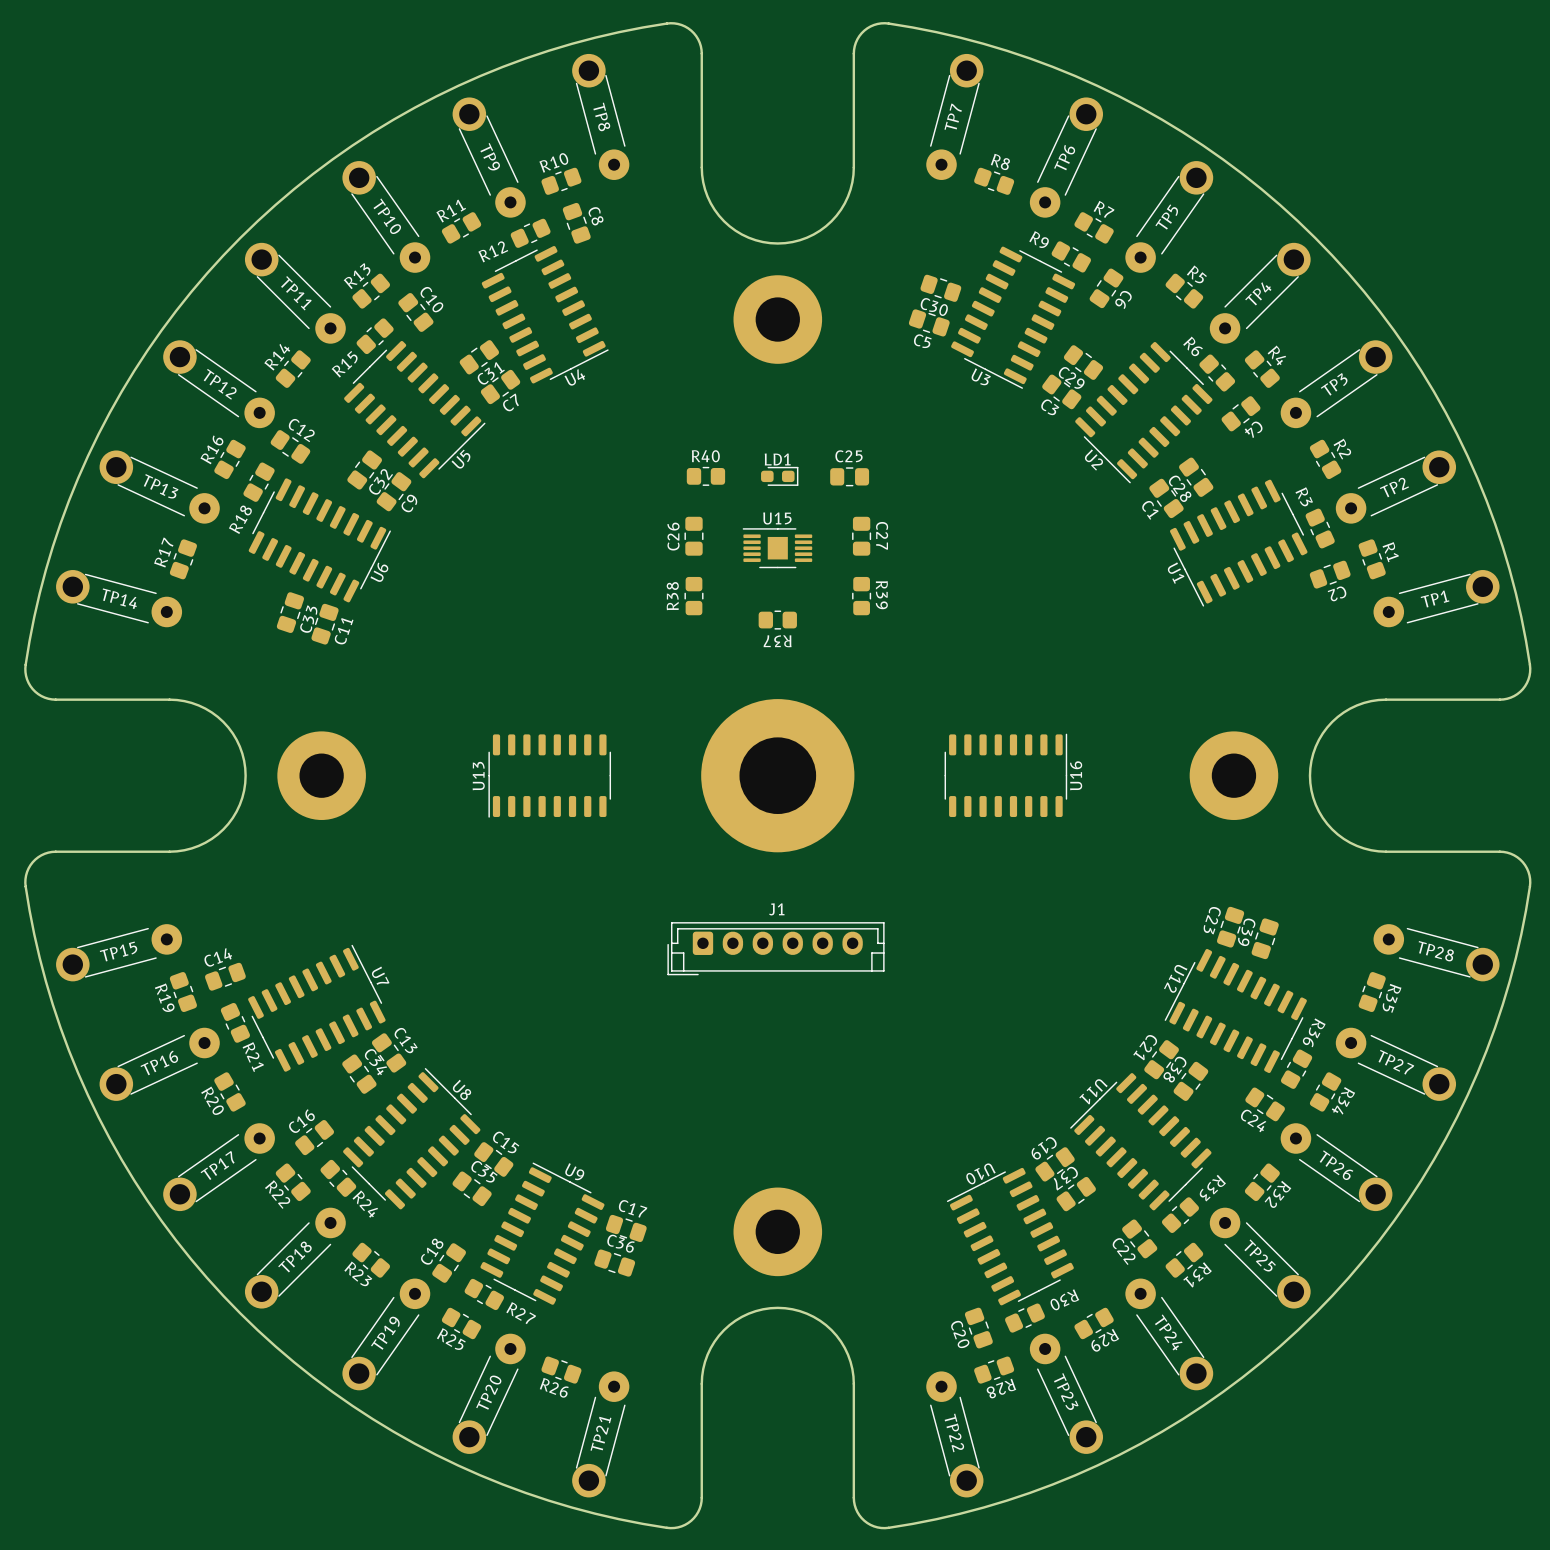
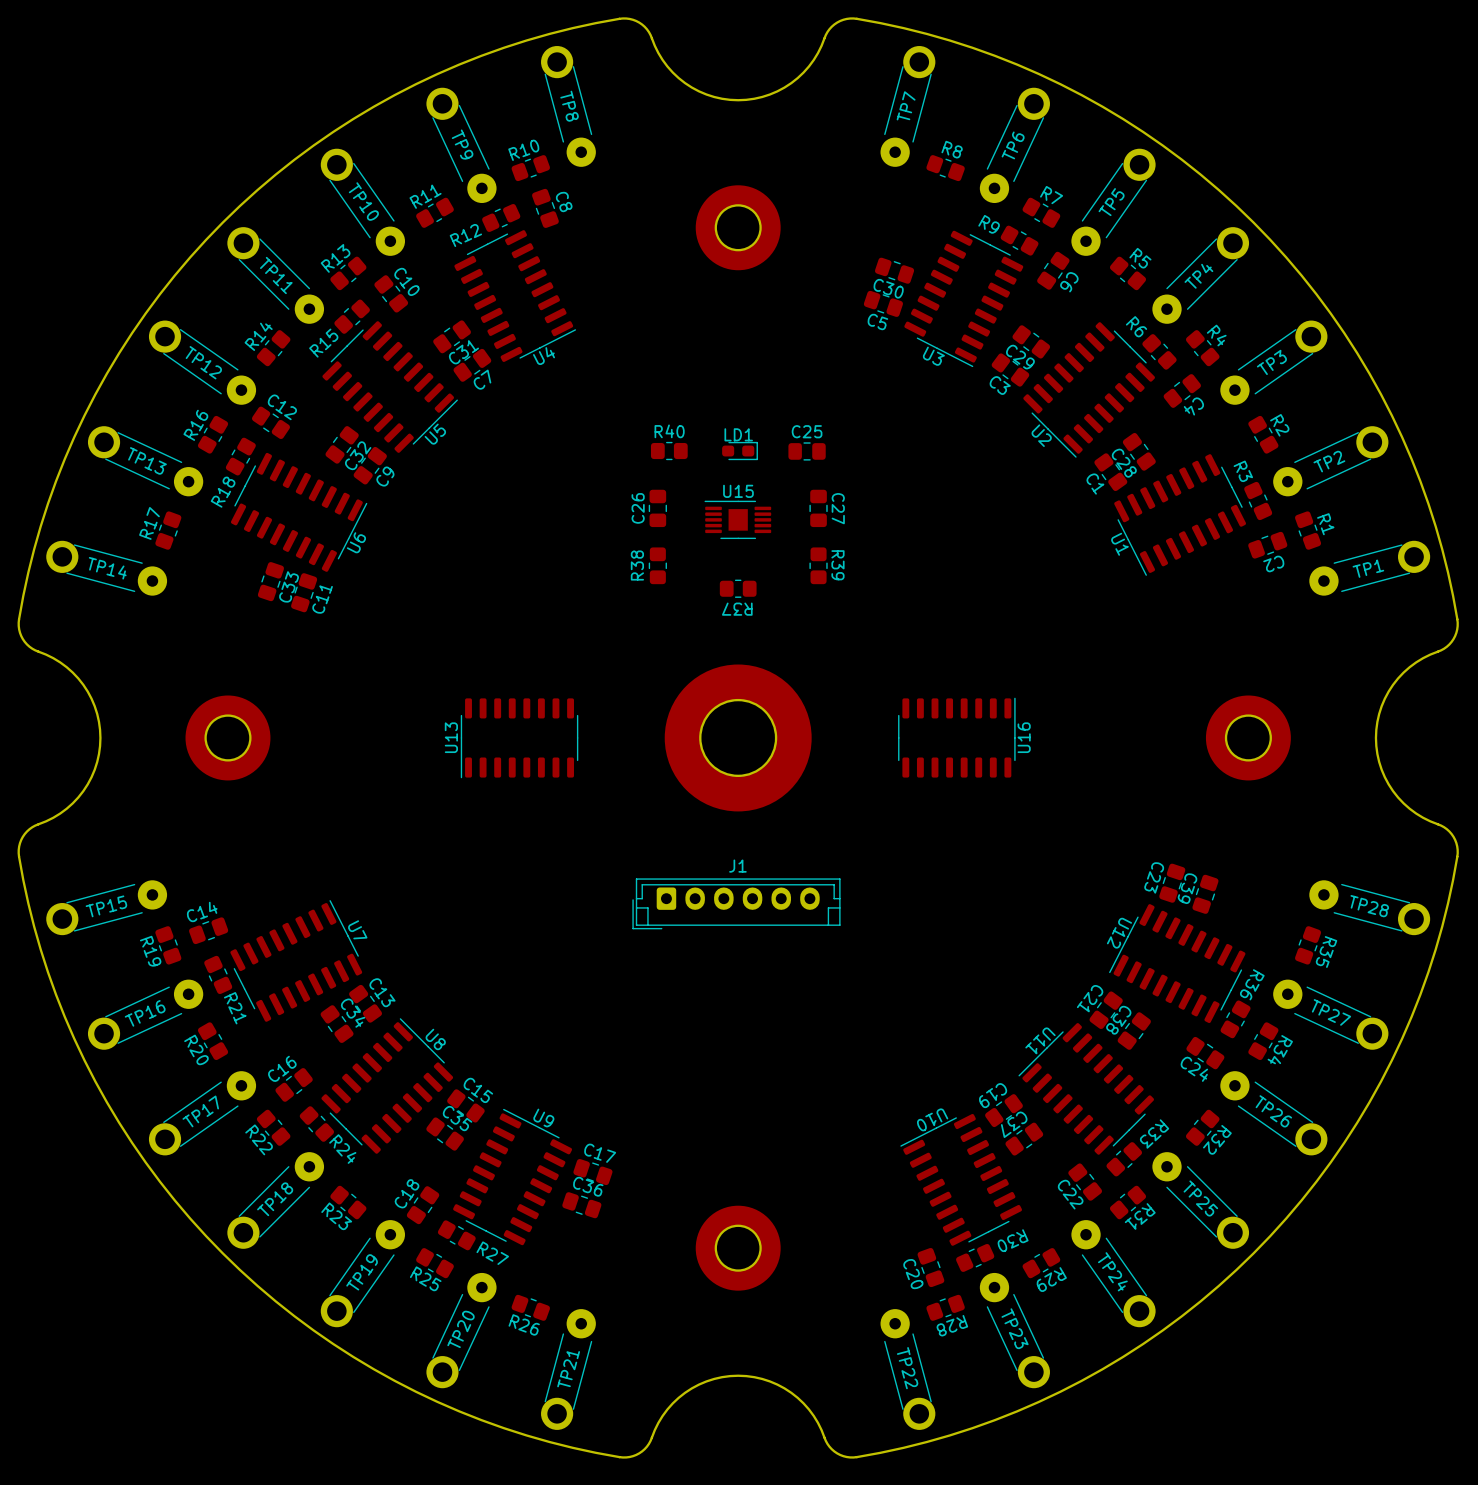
board edge: (666, 23) (595, 37) (525, 58) (458, 85) (393, 119) (332, 159) (275, 204) (240, 238) (206, 273) (161, 330) (134, 370) (109, 412) (87, 456) (68, 500) (52, 546) (39, 593) (29, 640) (25, 664) (26, 675) (35, 691) (52, 699) (177, 700) (205, 708) (223, 721) (236, 739) (244, 760) (244, 790) (236, 811) (228, 823) (217, 834) (198, 845) (169, 851) (48, 852) (38, 857) (30, 865) (26, 875) (25, 886) (39, 958) (60, 1027) (87, 1095) (121, 1159) (147, 1200) (176, 1240) (223, 1295) (275, 1346) (332, 1391) (372, 1419) (414, 1443) (458, 1465) (502, 1484) (548, 1500) (595, 1513) (642, 1523) (666, 1527) (678, 1527) (693, 1518) (701, 1501) (702, 1376) (710, 1348) (724, 1330) (748, 1313) (770, 1308) (792, 1309) (806, 1313) (826, 1325) (841, 1341) (848, 1354) (853, 1383) (854, 1505) (859, 1515) (867, 1523) (877, 1527) (888, 1527) (960, 1513) (1029, 1492) (1097, 1465) (1161, 1431) (1223, 1391) (1261, 1362) (1297, 1330) (1348, 1277) (1394, 1220) (1421, 1180) (1445, 1138) (1467, 1095) (1486, 1050) (1502, 1004) (1515, 958) (1526, 910) (1529, 886) (1529, 875) (1520, 859) (1503, 851) (1378, 851) (1350, 842) (1332, 829) (1318, 811) (1311, 790) (1311, 760) (1318, 739) (1327, 727) (1337, 716) (1356, 705) (1386, 699) (1507, 698) (1517, 694) (1525, 686) (1529, 675) (1529, 664) (1515, 593) (1495, 523) (1467, 456) (1433, 391) (1394, 330) (1348, 273) (1297, 221) (1261, 189) (1223, 159) (1182, 132) (1140, 107) (1097, 85) (1052, 66) (1006, 50) (960, 37) (912, 27) (888, 23) (877, 23) (861, 33) (854, 49) (853, 174) (844, 203) (831, 221) (813, 234) (792, 242) (762, 242) (748, 237) (729, 226) (719, 215) (707, 196) (701, 167) (700, 46) (696, 36) (688, 28) (678, 23) (666, 23) -> (619, 18) (549, 33) (481, 55) (415, 84) (353, 119) (294, 159) (239, 205) (190, 257) (145, 313) (106, 373) (74, 437) (47, 503) (28, 572) (19, 619) (21, 636) (32, 648) (53, 658) (66, 667) (83, 684) (97, 713) (100, 737) (97, 761) (83, 791) (60, 813) (27, 831) (20, 843) (19, 856) (34, 926) (56, 994) (84, 1060) (119, 1122) (159, 1181) (206, 1236) (257, 1285) (313, 1330) (373, 1369) (437, 1401) (503, 1428) (572, 1447) (619, 1457) (636, 1454) (648, 1443) (658, 1422) (667, 1409) (685, 1392) (706, 1381) (738, 1375) (769, 1381) (791, 1392) (813, 1415) (831, 1449) (843, 1456) (856, 1457) (926, 1442) (994, 1420) (1060, 1391) (1123, 1356) (1181, 1316) (1236, 1269) (1286, 1218) (1330, 1162) (1369, 1102) (1402, 1038) (1428, 972) (1448, 903) (1457, 856) (1455, 839) (1444, 827) (1423, 817) (1409, 808) (1393, 791) (1381, 769) (1375, 737) (1379, 713) (1393, 684) (1416, 662) (1449, 644) (1456, 632) (1457, 619) (1442, 549) (1420, 481) (1391, 415) (1357, 353) (1316, 294) (1270, 239) (1218, 189) (1162, 145) (1102, 106) (1038, 74) (972, 47) (903, 28) (856, 18) (840, 21) (827, 32) (817, 53) (808, 66) (791, 83) (762, 96) (738, 100) (714, 96) (685, 83) (662, 59) (644, 26) (633, 19) (619, 18)
part position: (777, 319) -> (738, 227)
part position: (321, 775) -> (227, 737)
part position: (1233, 775) -> (1248, 737)
part position: (777, 1231) -> (738, 1248)

